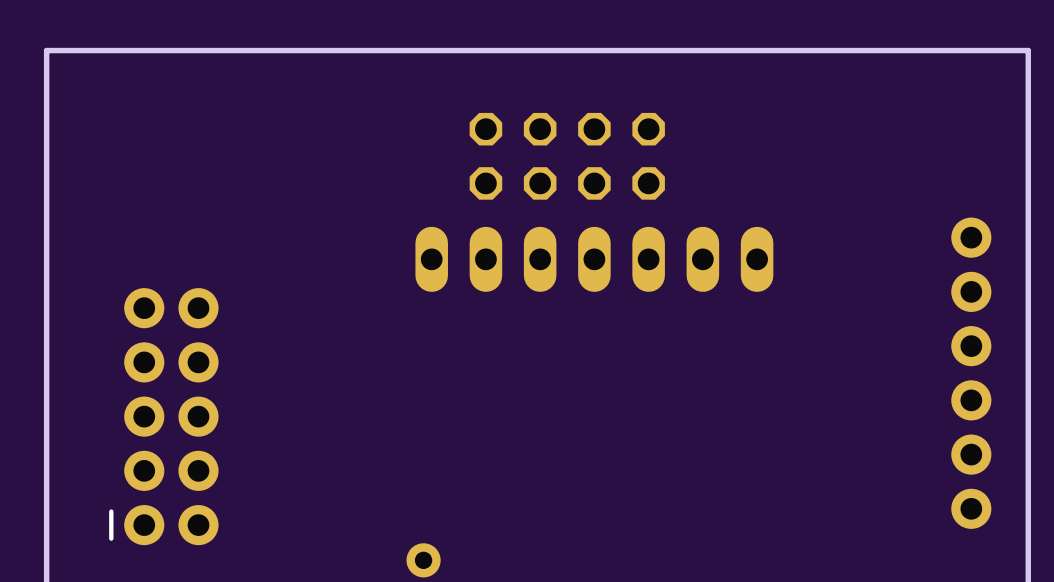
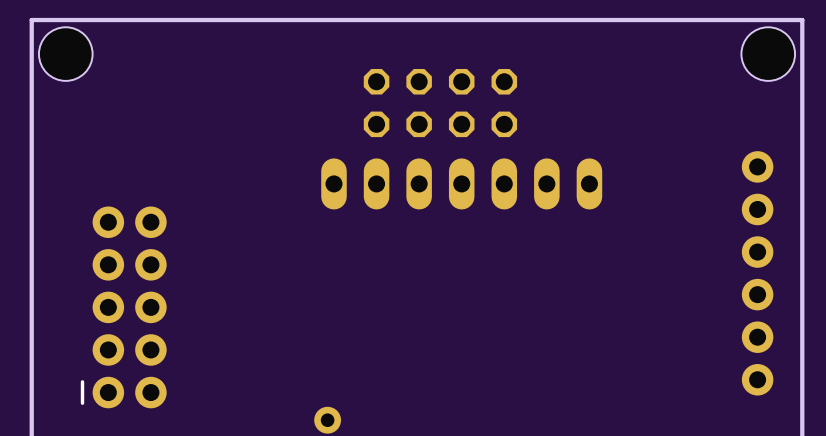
hole: none -> (65, 54)
hole: none -> (768, 54)

